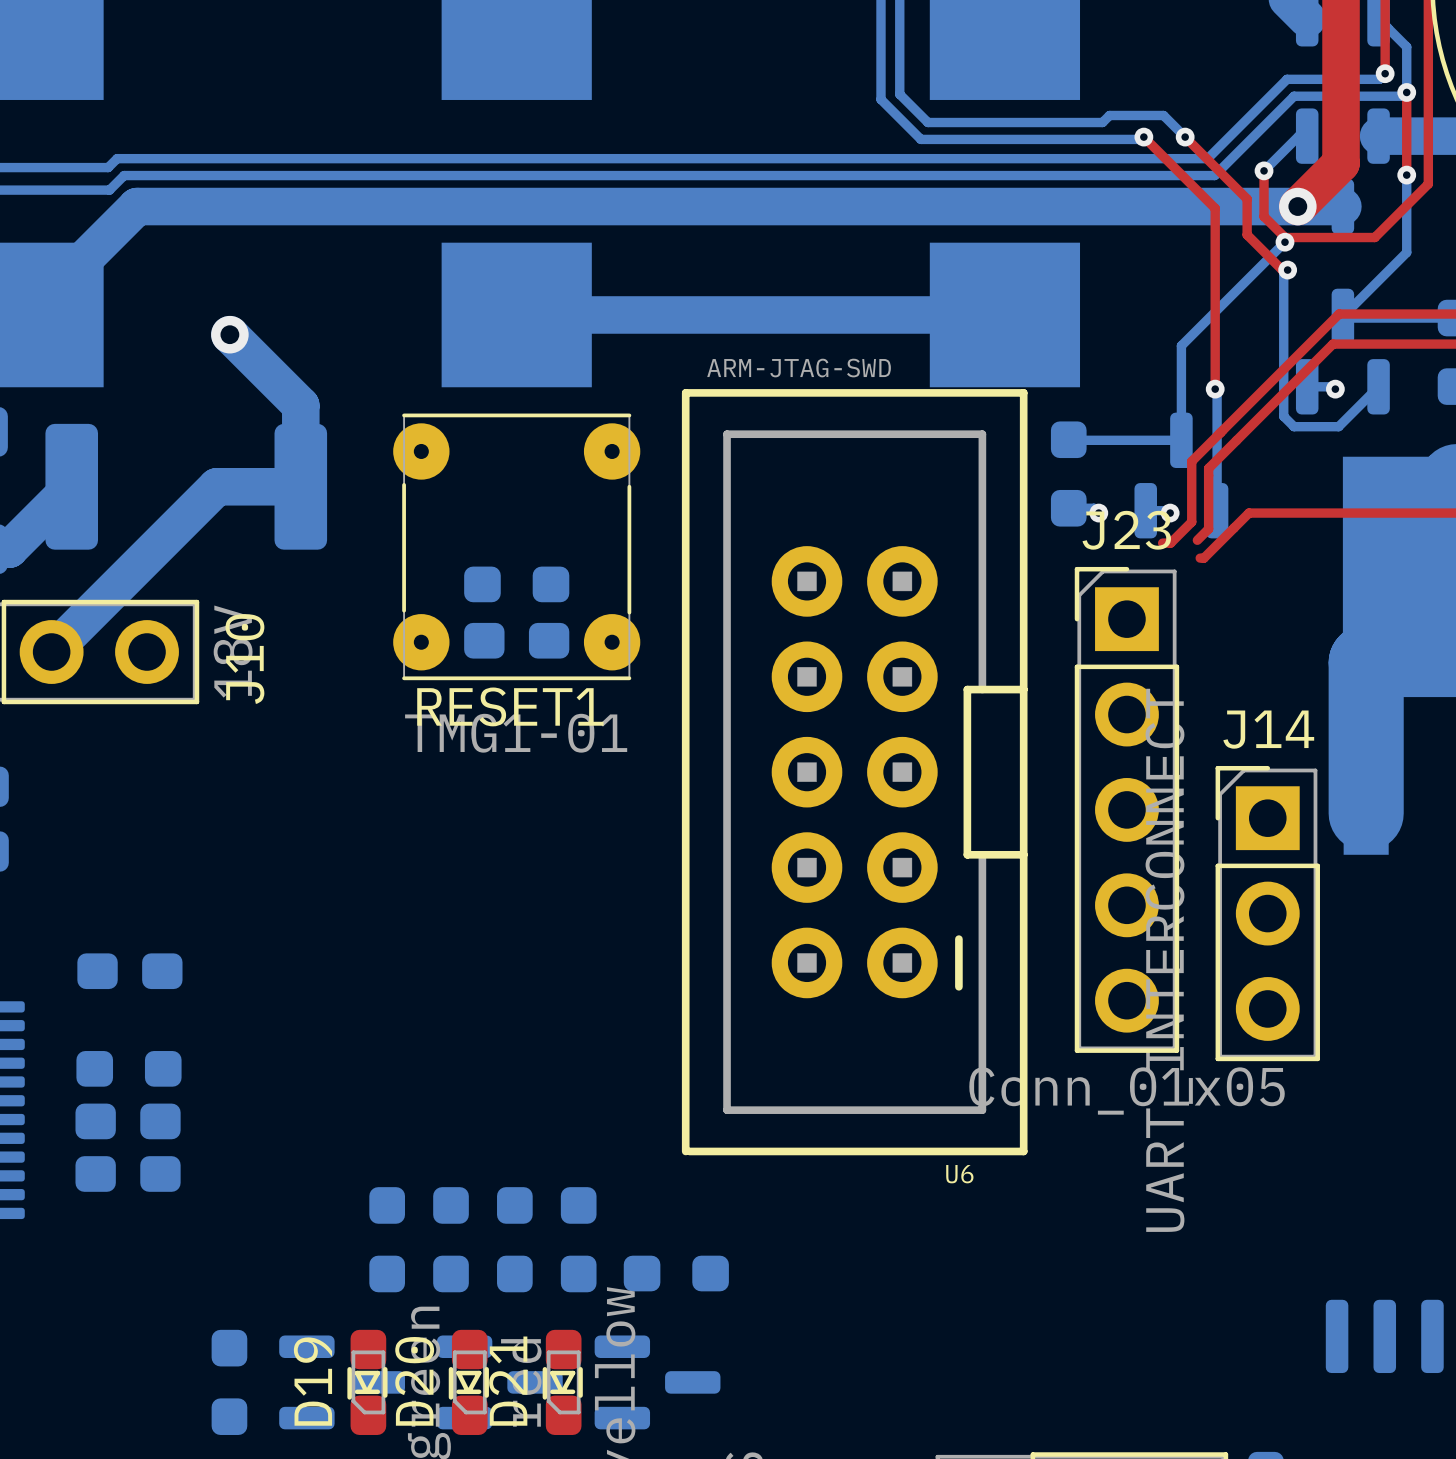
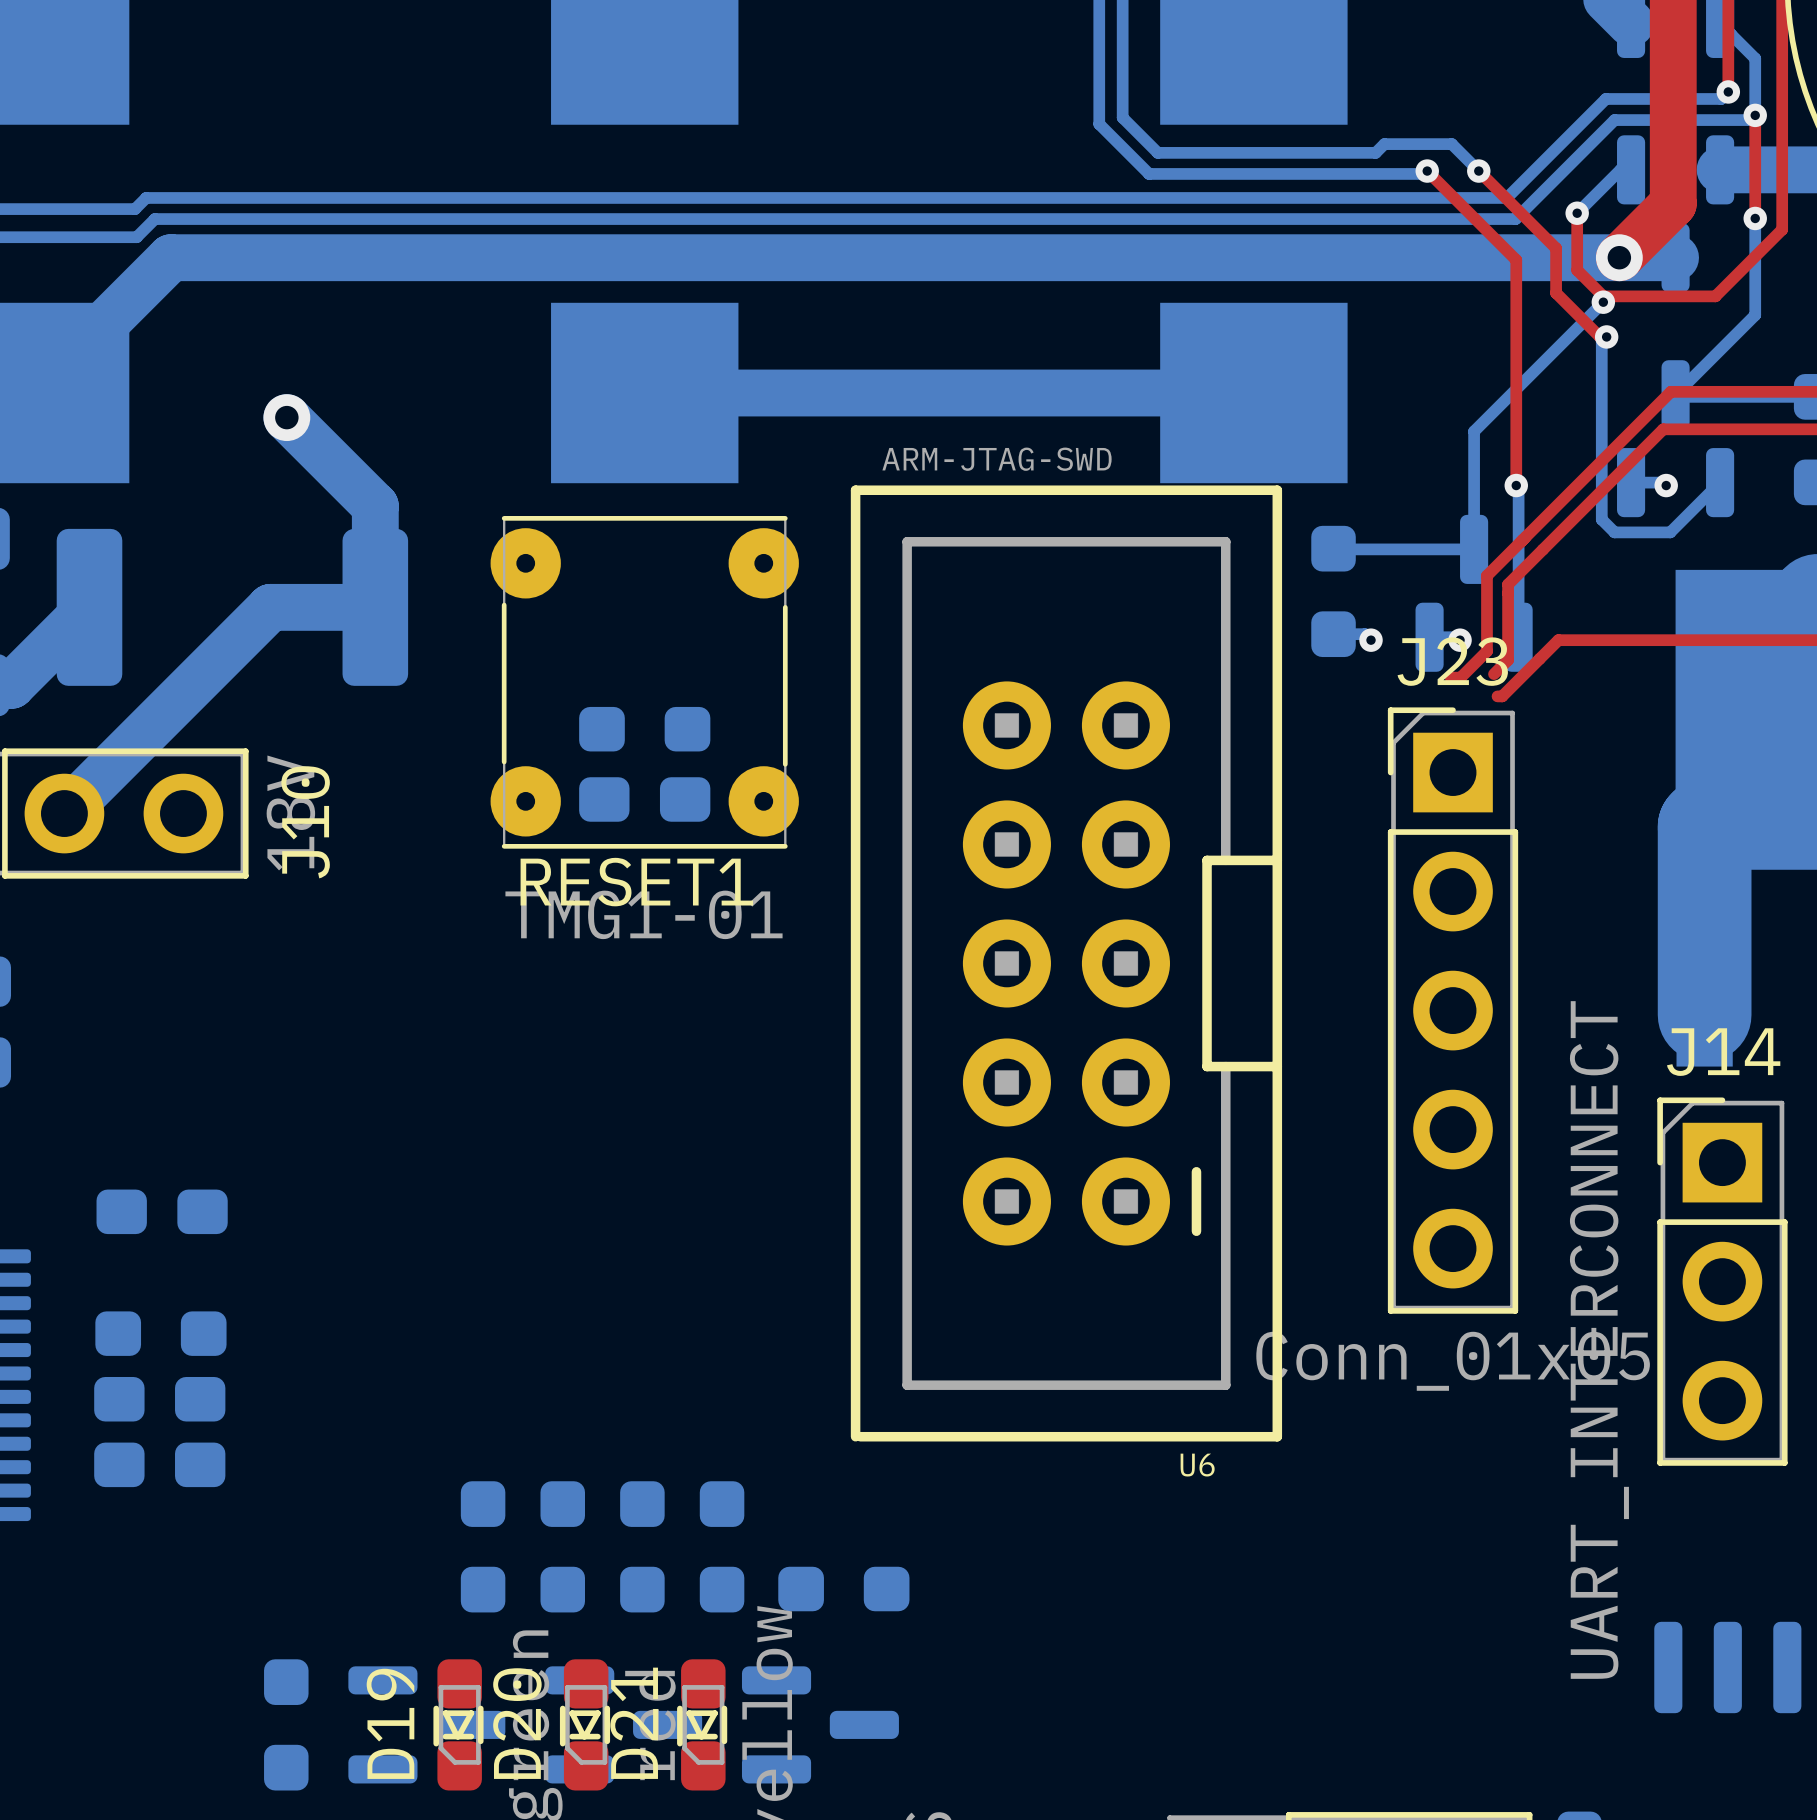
J23 position: (1126, 809) -> (1453, 1010)
J14 position: (1267, 913) -> (1722, 1281)

